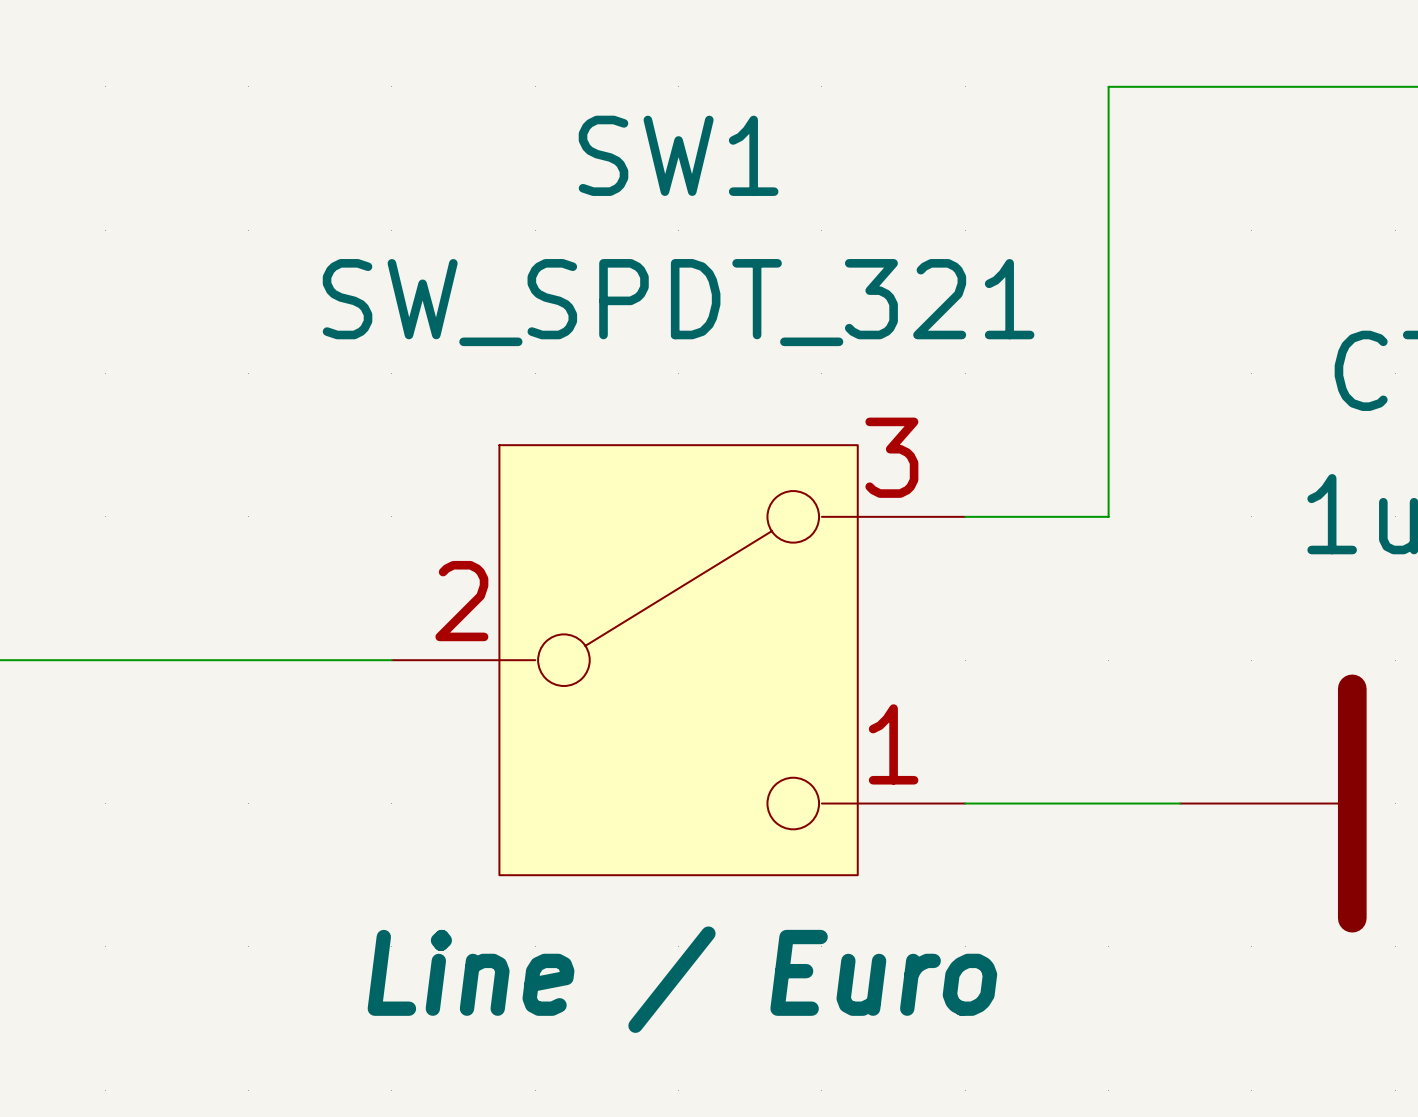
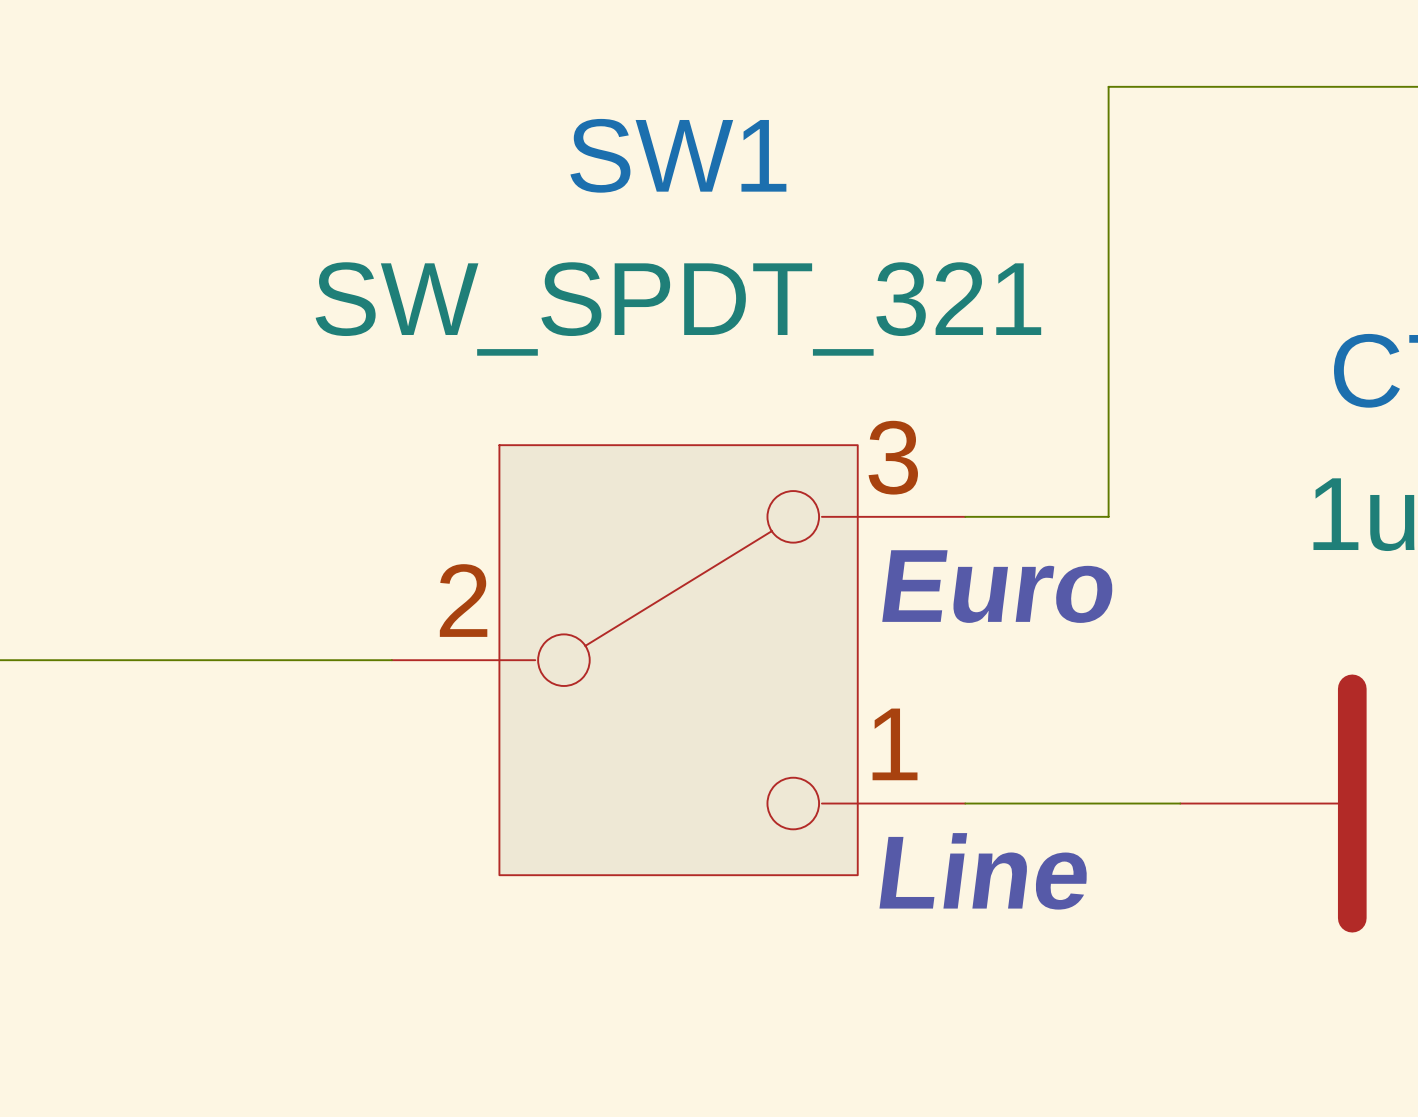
text: none -> Euro (997, 586)
text: none -> Line (983, 871)
SW1 text: Line / Euro (682, 979) -> none

